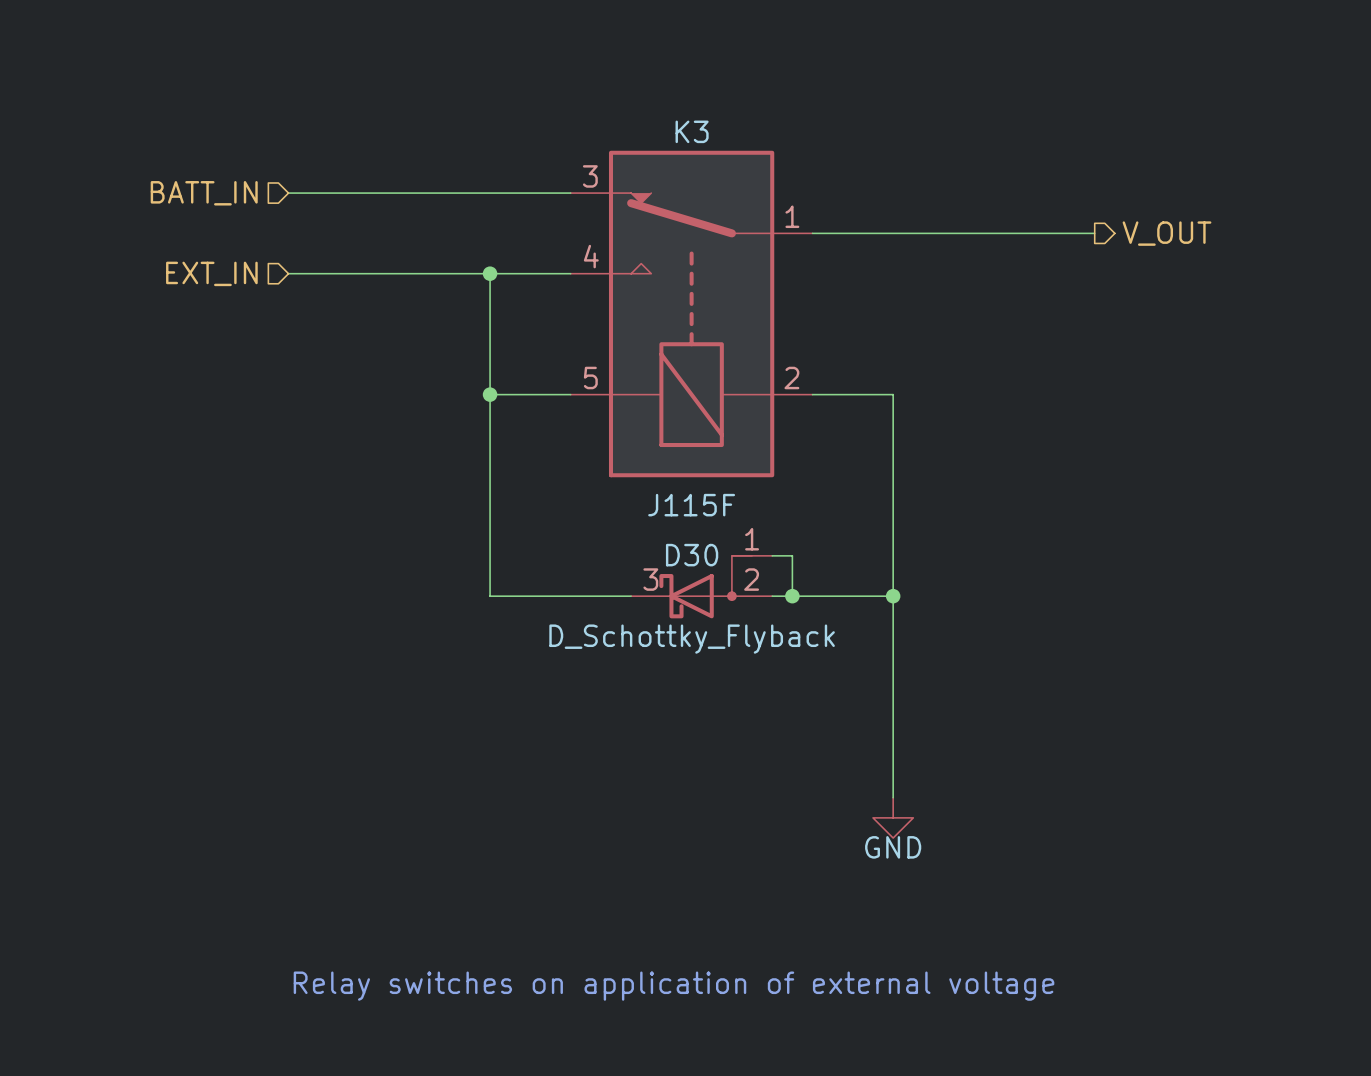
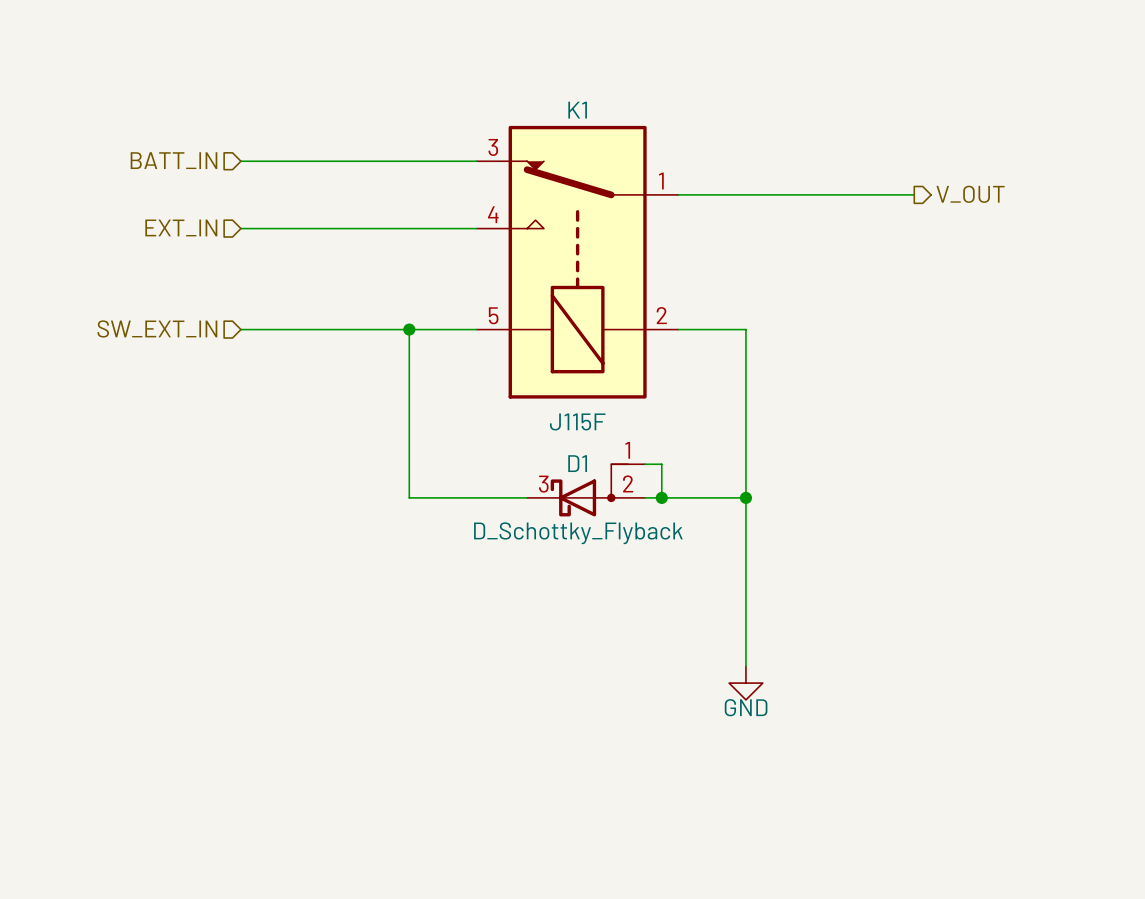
K3 name: K3 (692, 131) -> K1 (577, 110)
wire: (490, 273) (490, 394) -> (240, 329) (409, 329)
junction: (490, 273) -> none
hierarchical label: none -> SW_EXT_IN (157, 328)
D30 name: D30 (692, 555) -> D1 (577, 463)
text: Relay switches on application of external voltage (674, 986) -> none

